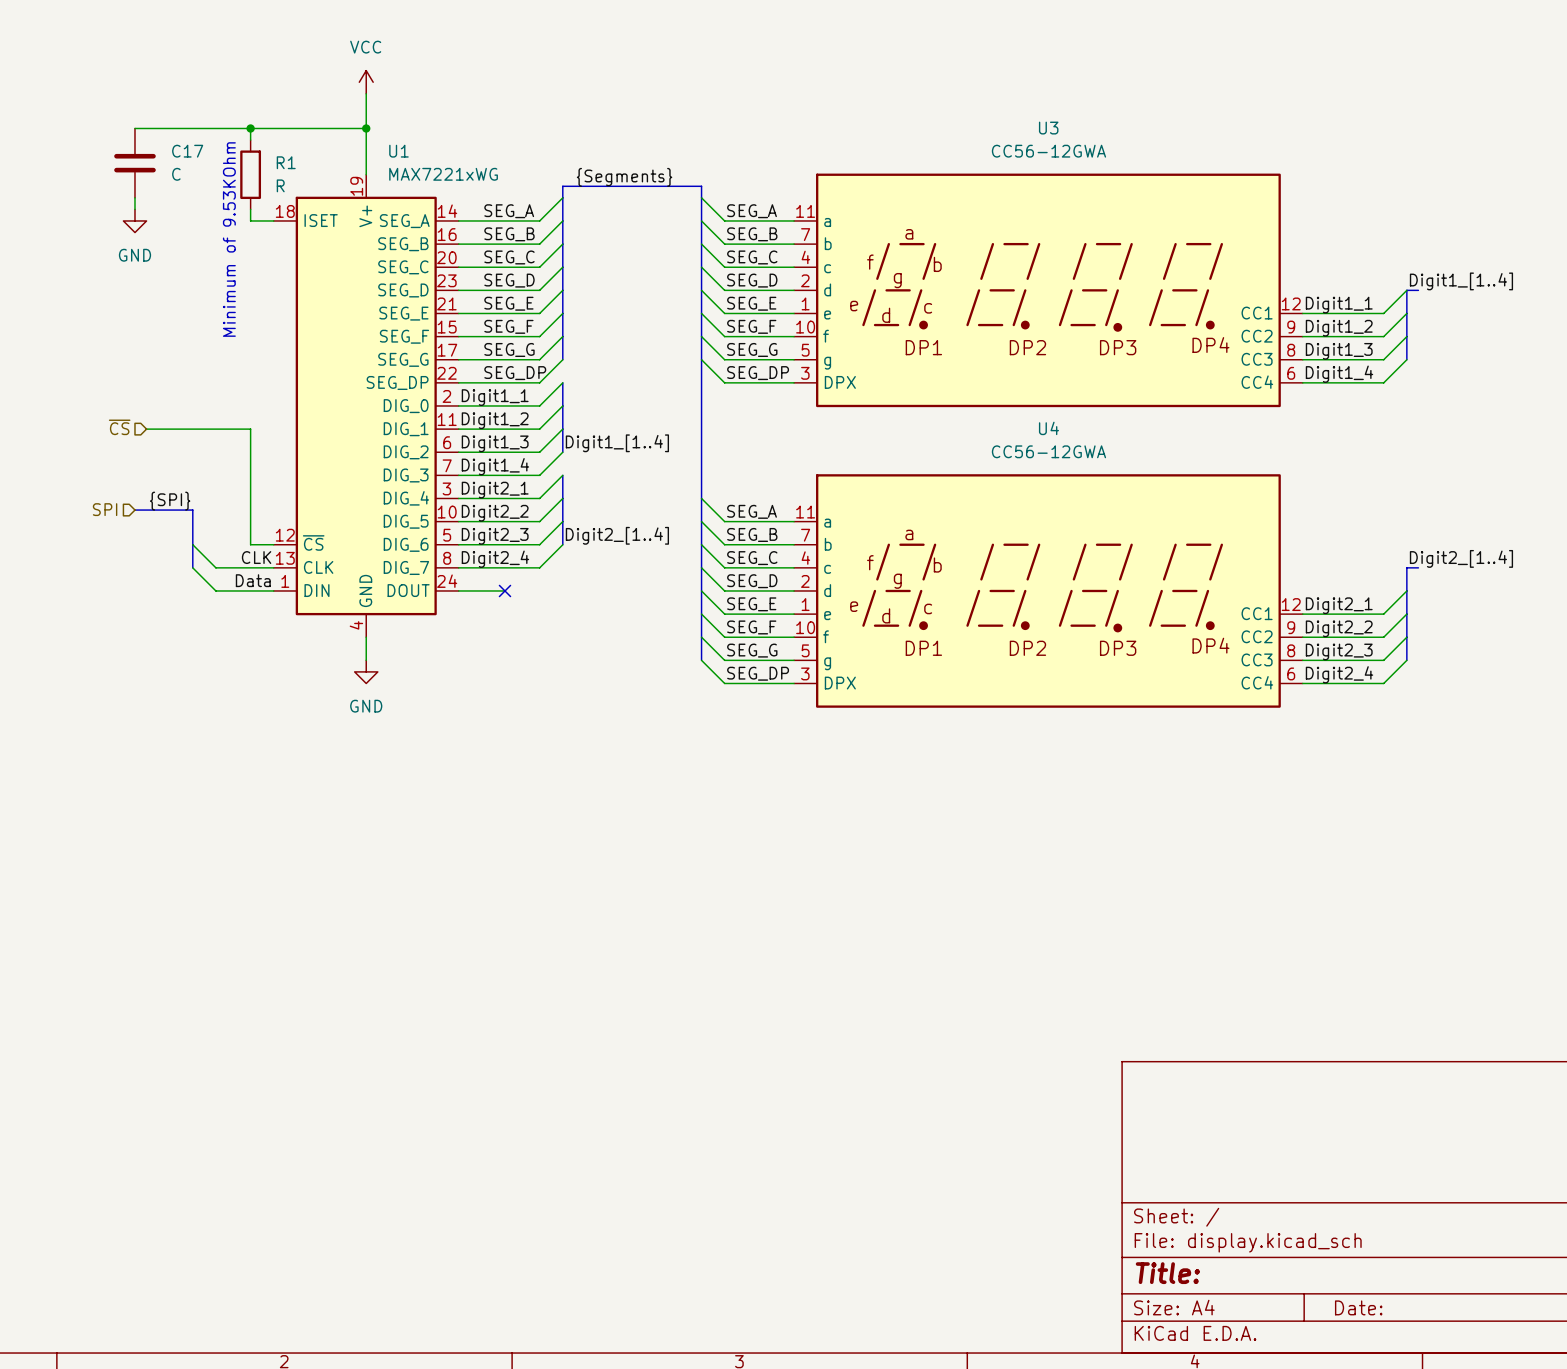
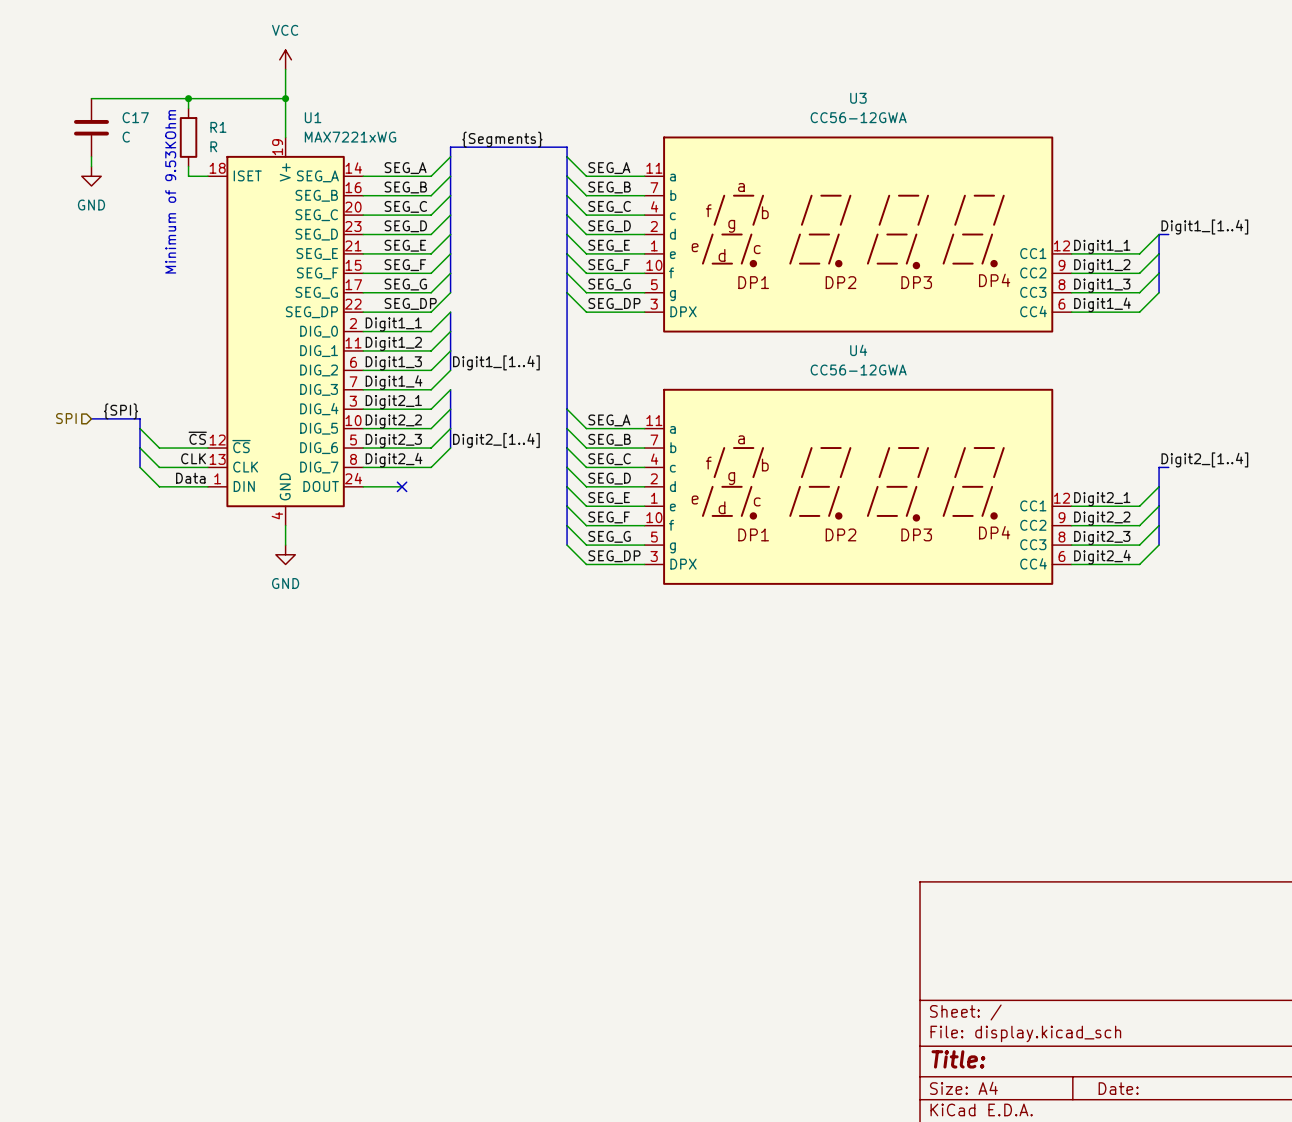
hierarchical label: ~{CS} (119, 427) -> none
wire: (146, 429) (250, 429) (250, 544) -> (140, 428) (159, 448) (188, 448)
label: none -> ~{CS} (197, 438)

